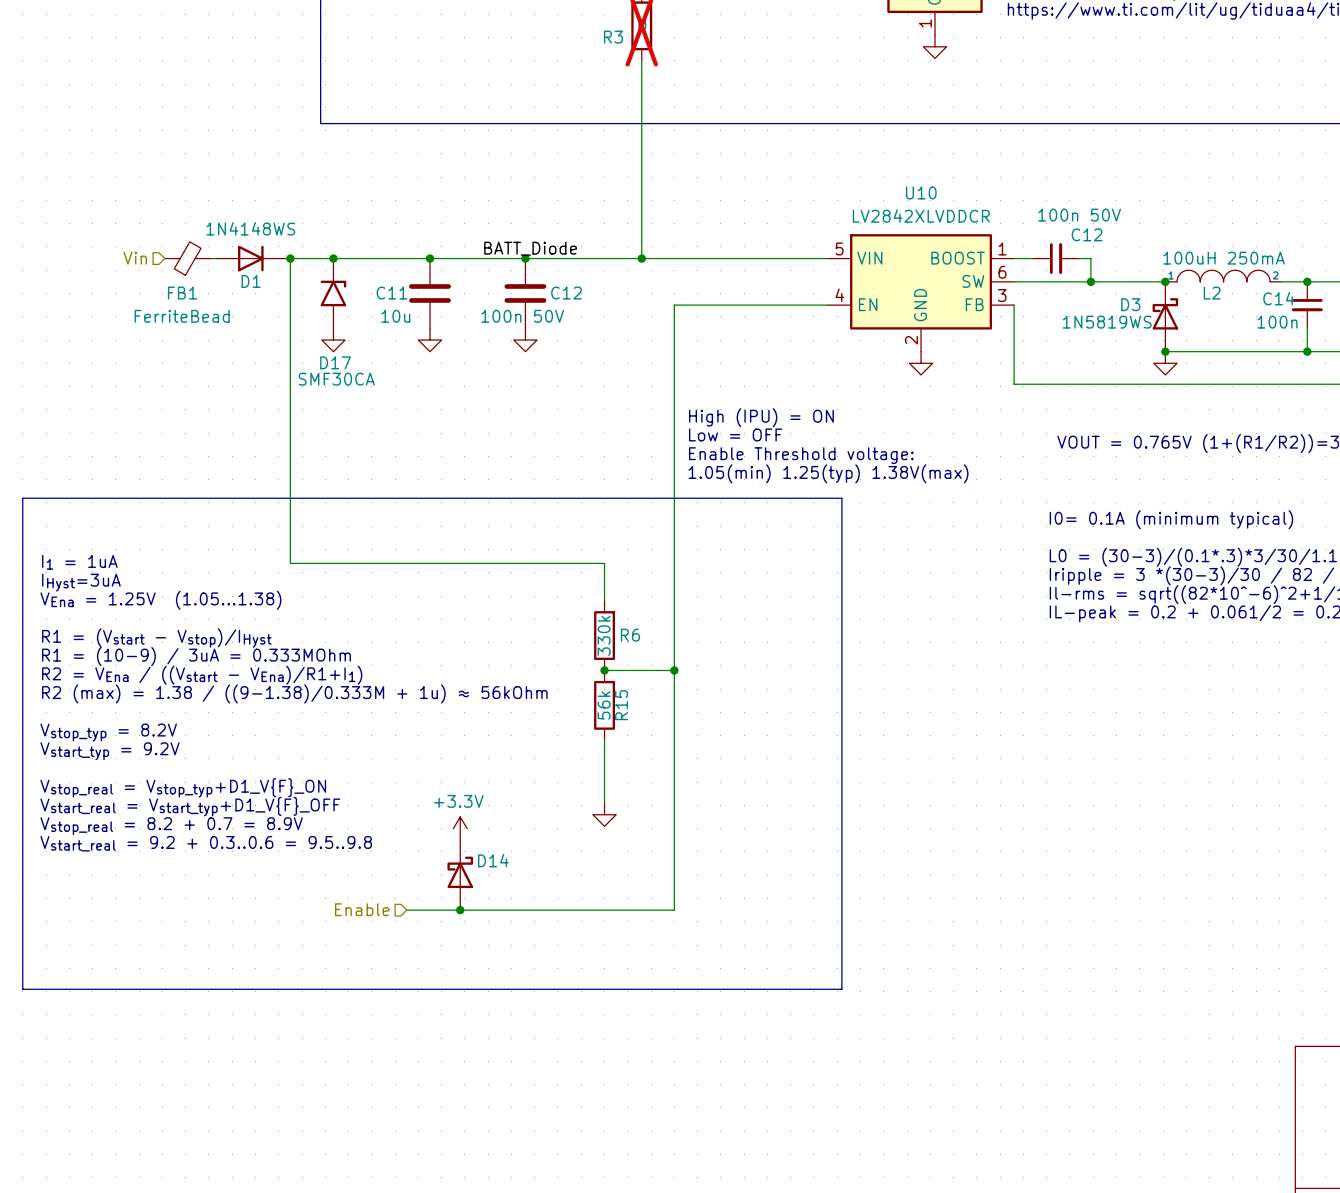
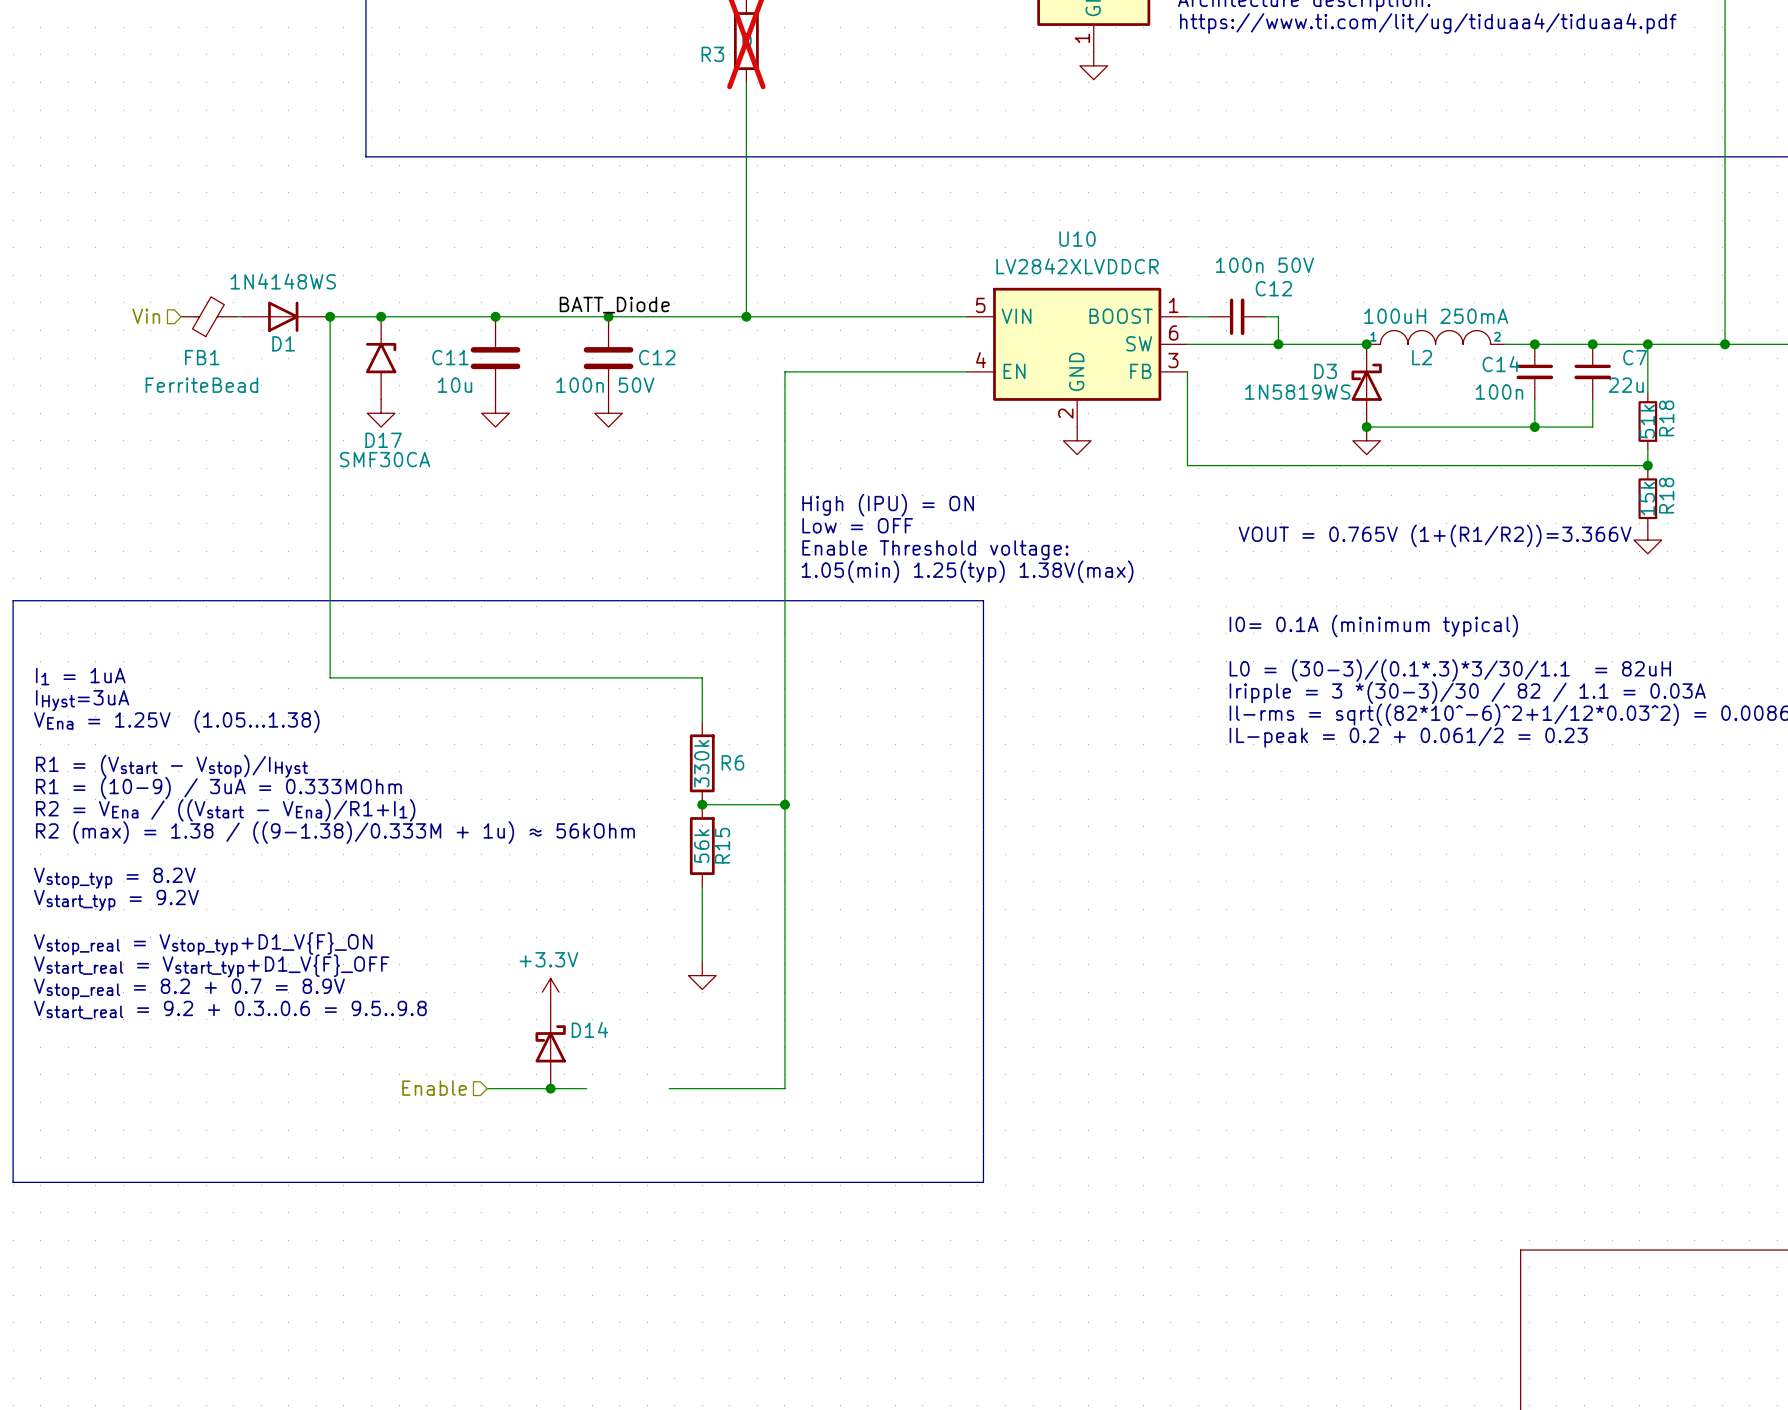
power symbol position: +3.3V (460, 828) -> +3.3V (550, 992)
D14 position: (460, 875) -> (550, 1047)
hierarchical label position: Enable (362, 909) -> Enable (434, 1088)
wire: (406, 910) (423, 910) -> none
junction position: (460, 910) -> (550, 1088)
wire: (506, 910) (576, 910) -> none

